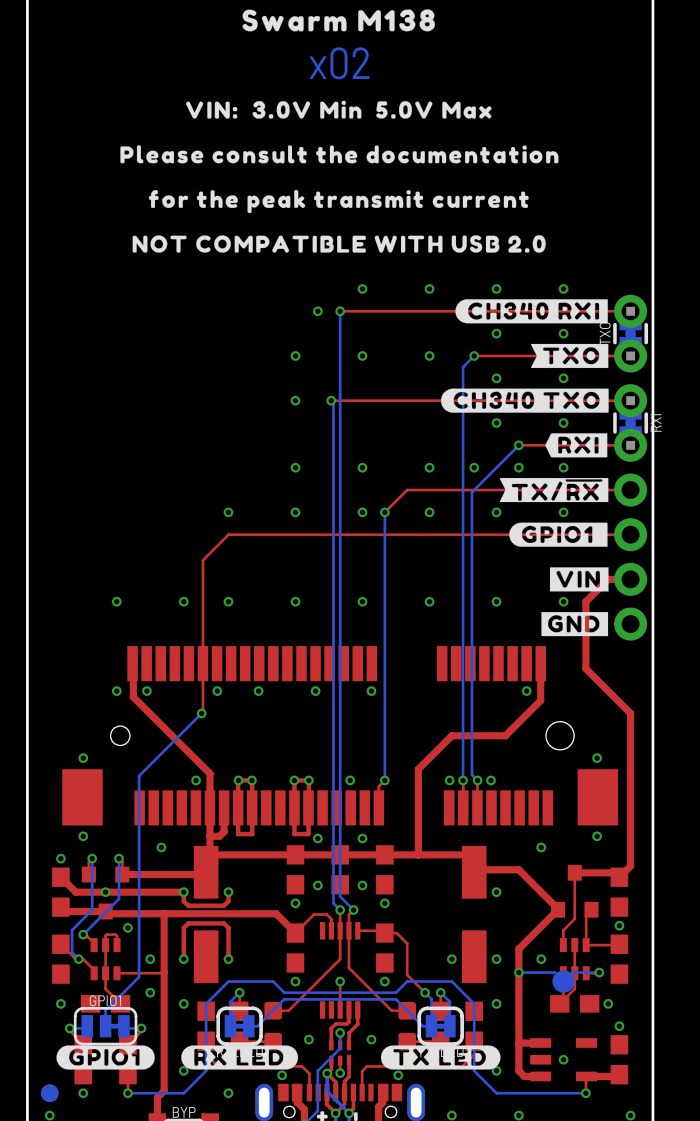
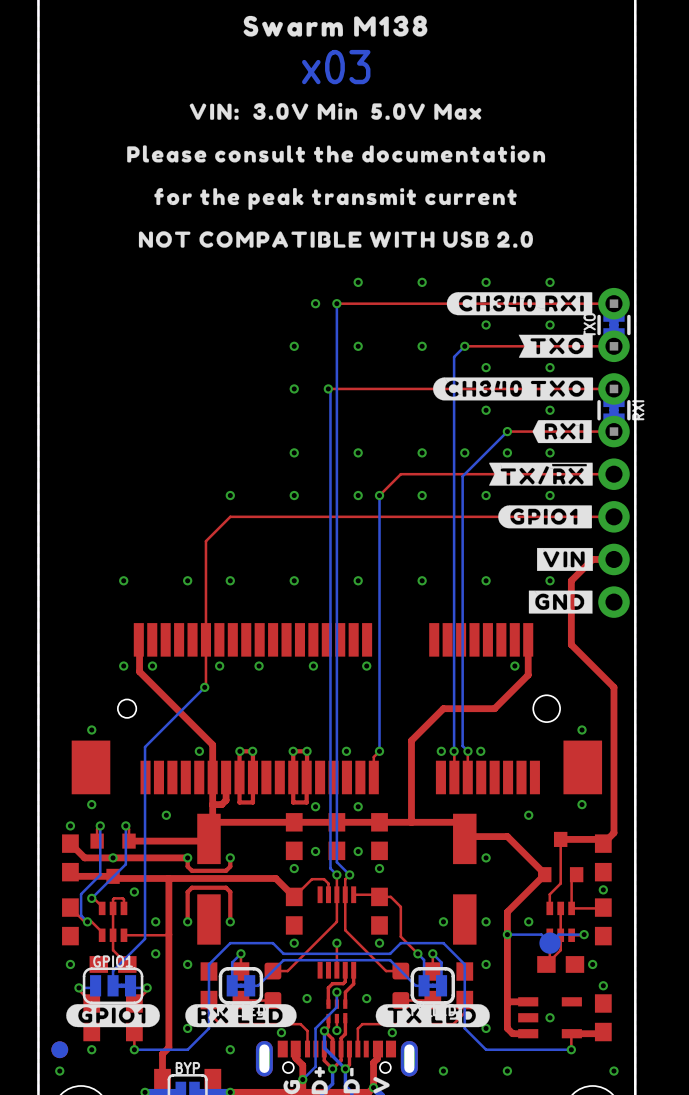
text: x02 (339, 63) -> x03 (336, 67)

